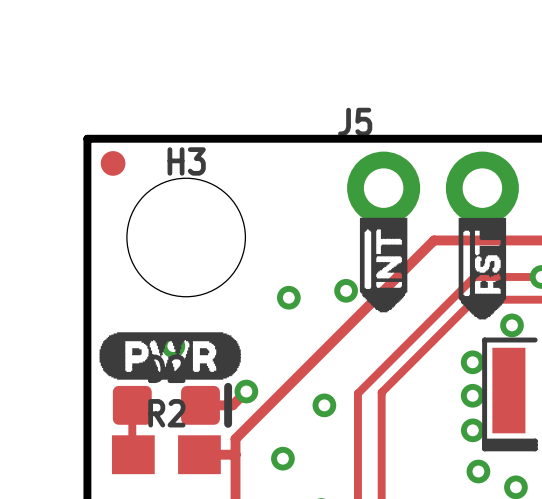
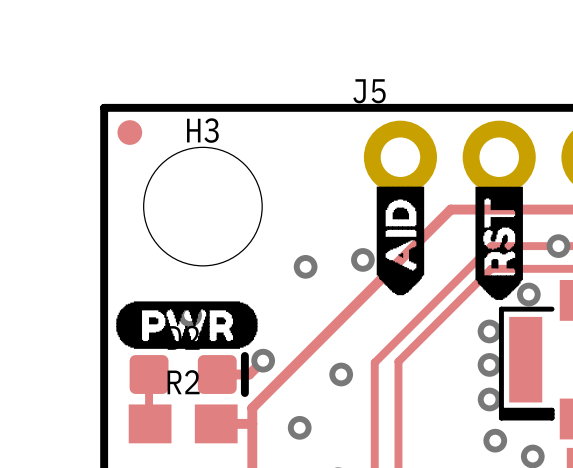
drawing shape: [359, 217, 408, 313] -> [376, 186, 425, 296]
drawing shape: [458, 217, 507, 320] -> [475, 186, 523, 300]

